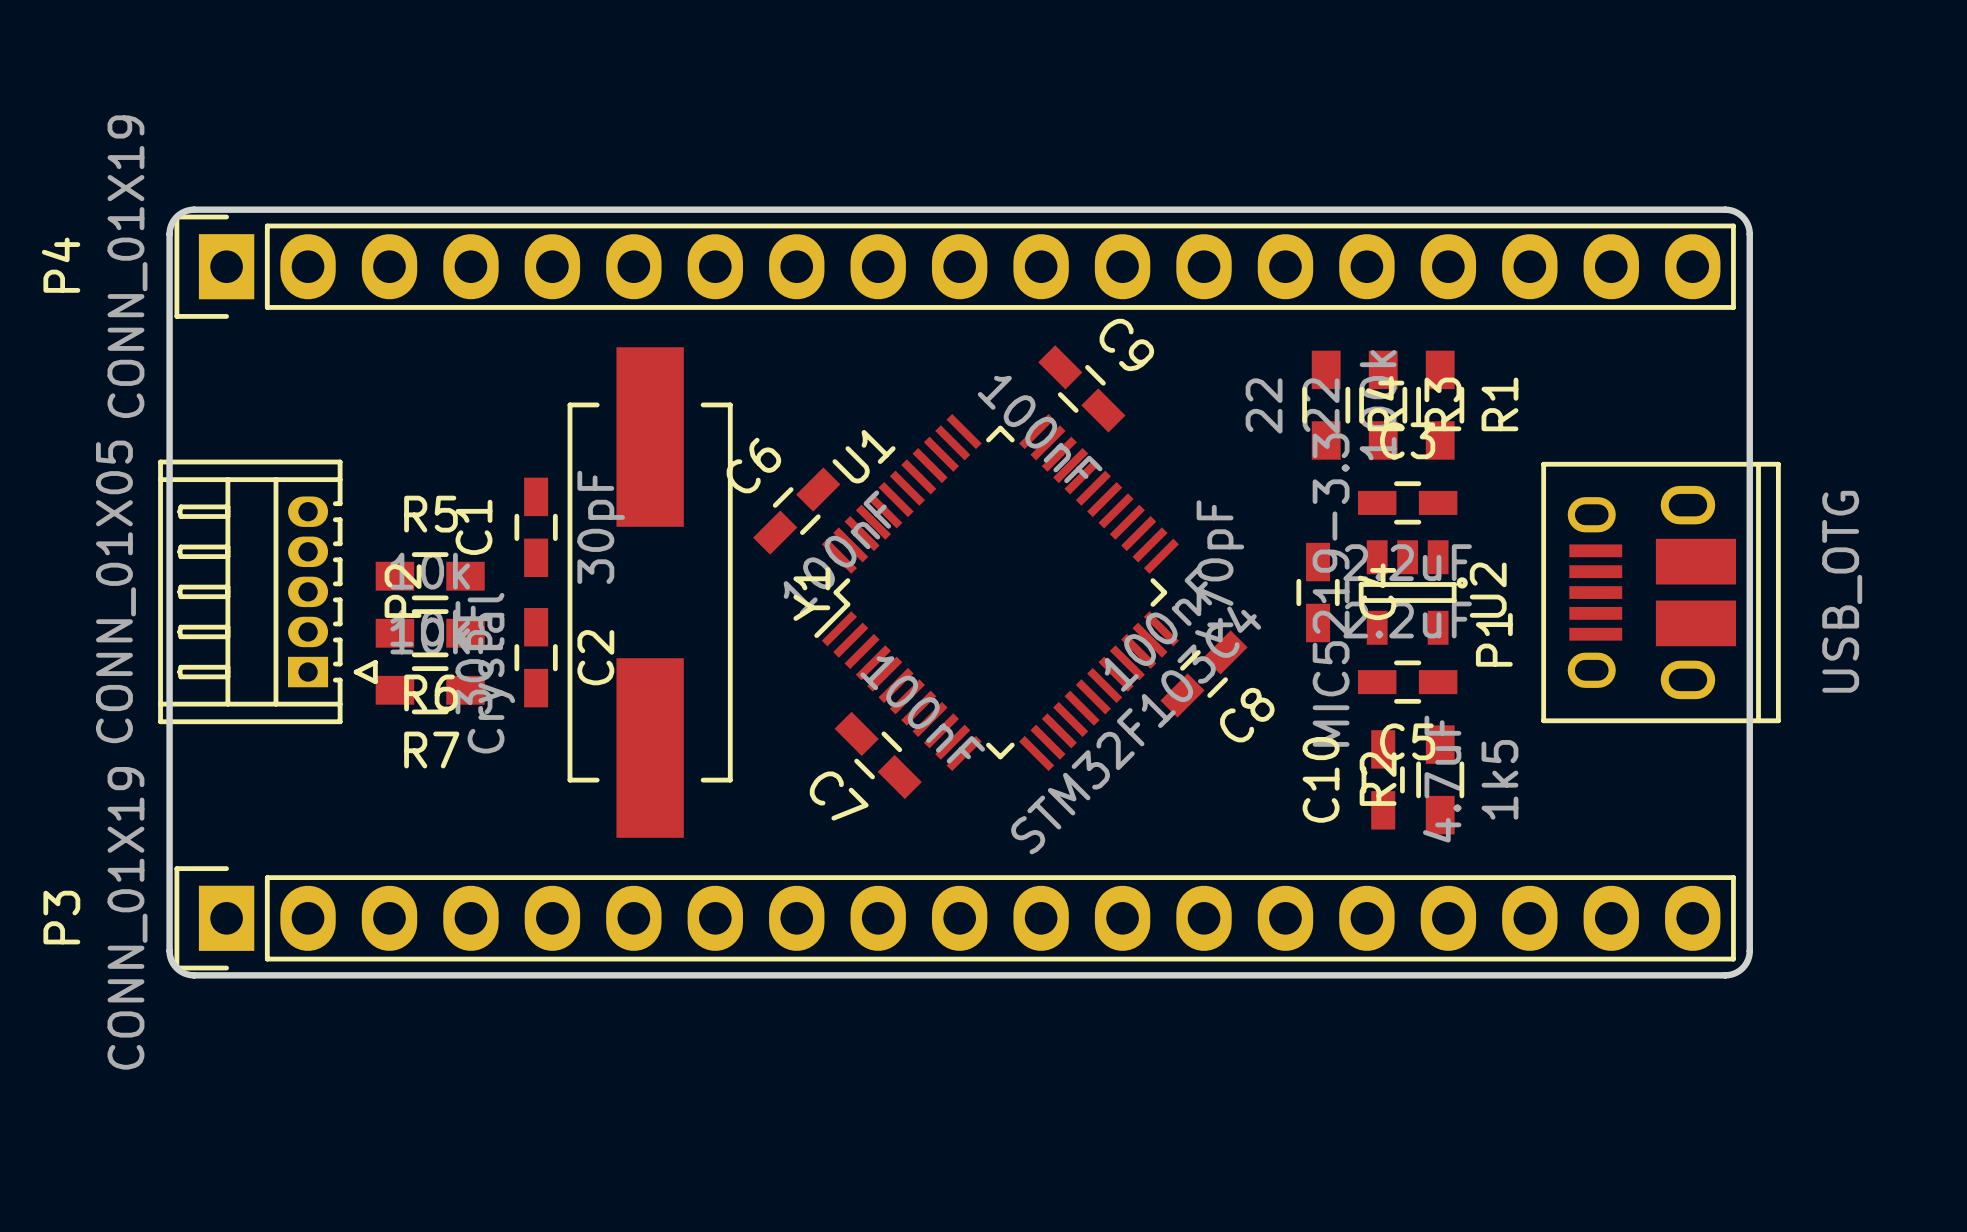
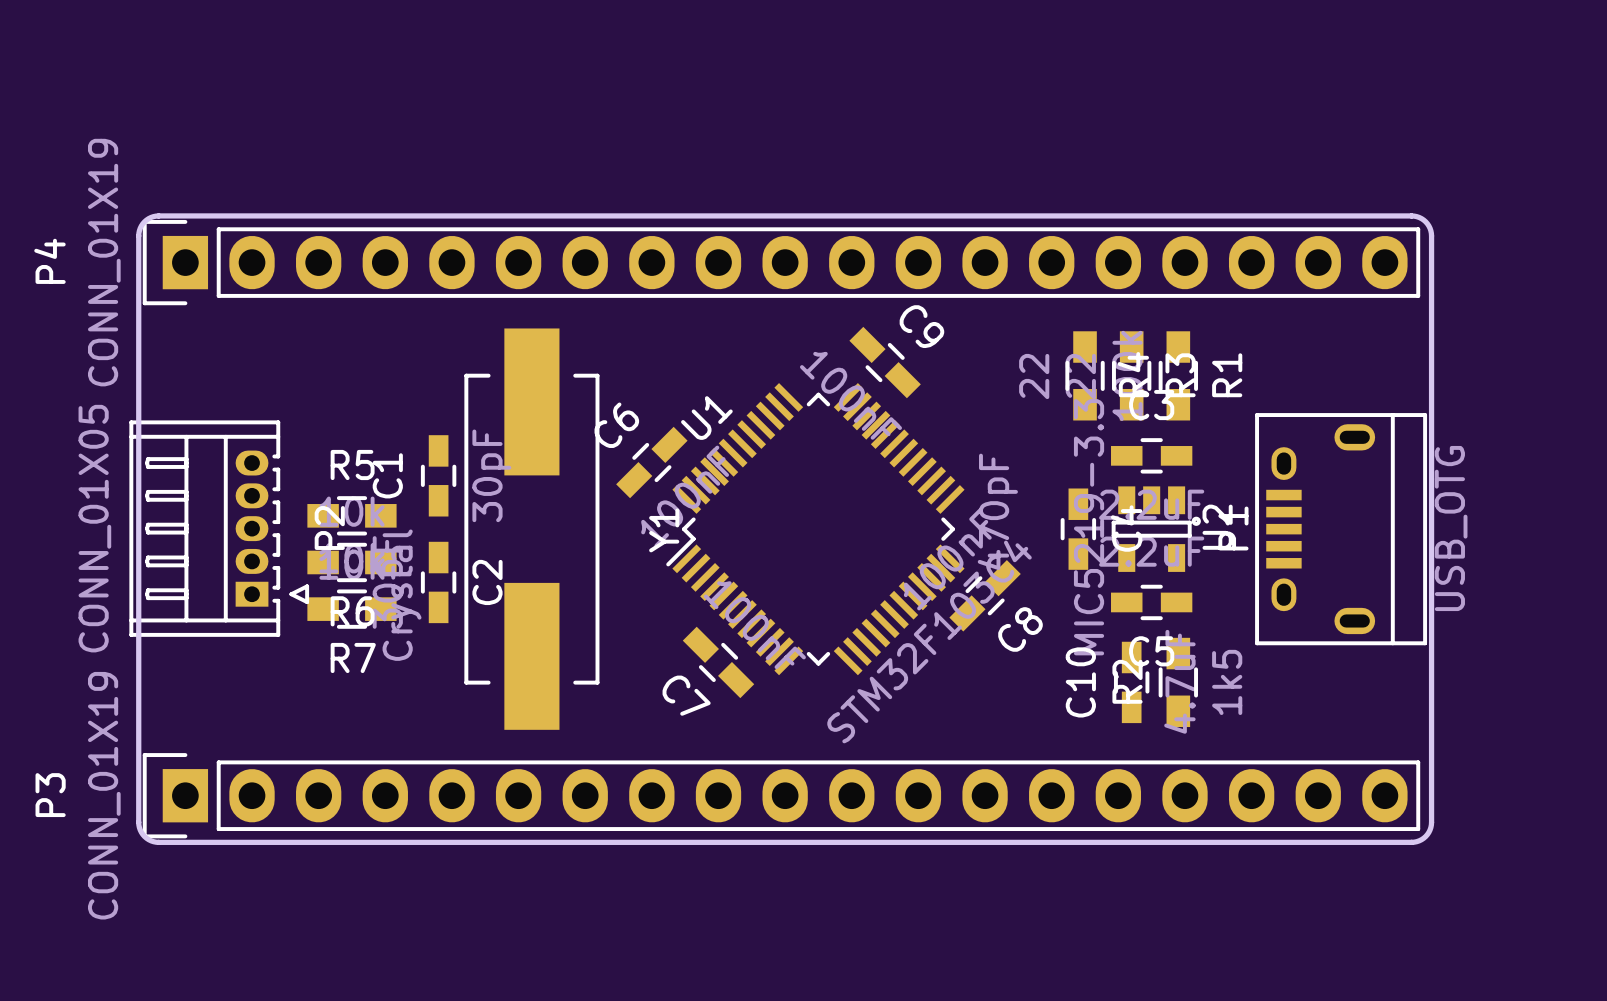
P1 footprint: [1541, 461, 1781, 724] -> [1255, 413, 1428, 646]

